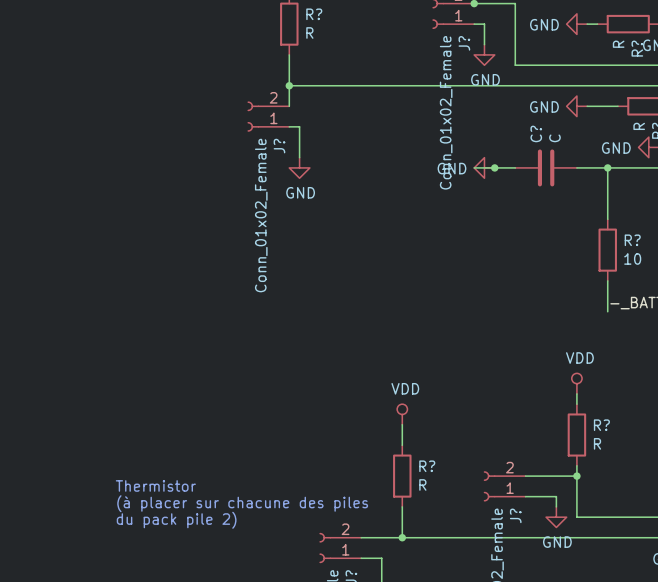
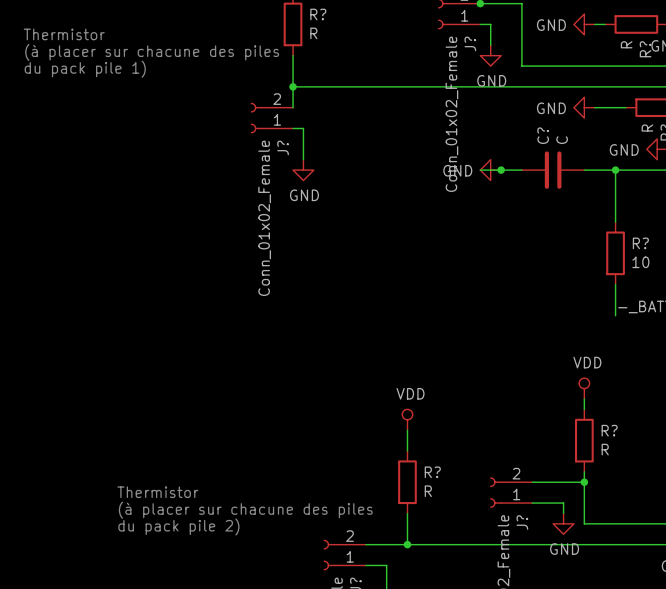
text: none -> Thermistor (64, 34)
text: none -> (à placer sur chacune des piles (152, 52)
text: none -> du pack pile 1) (85, 69)

